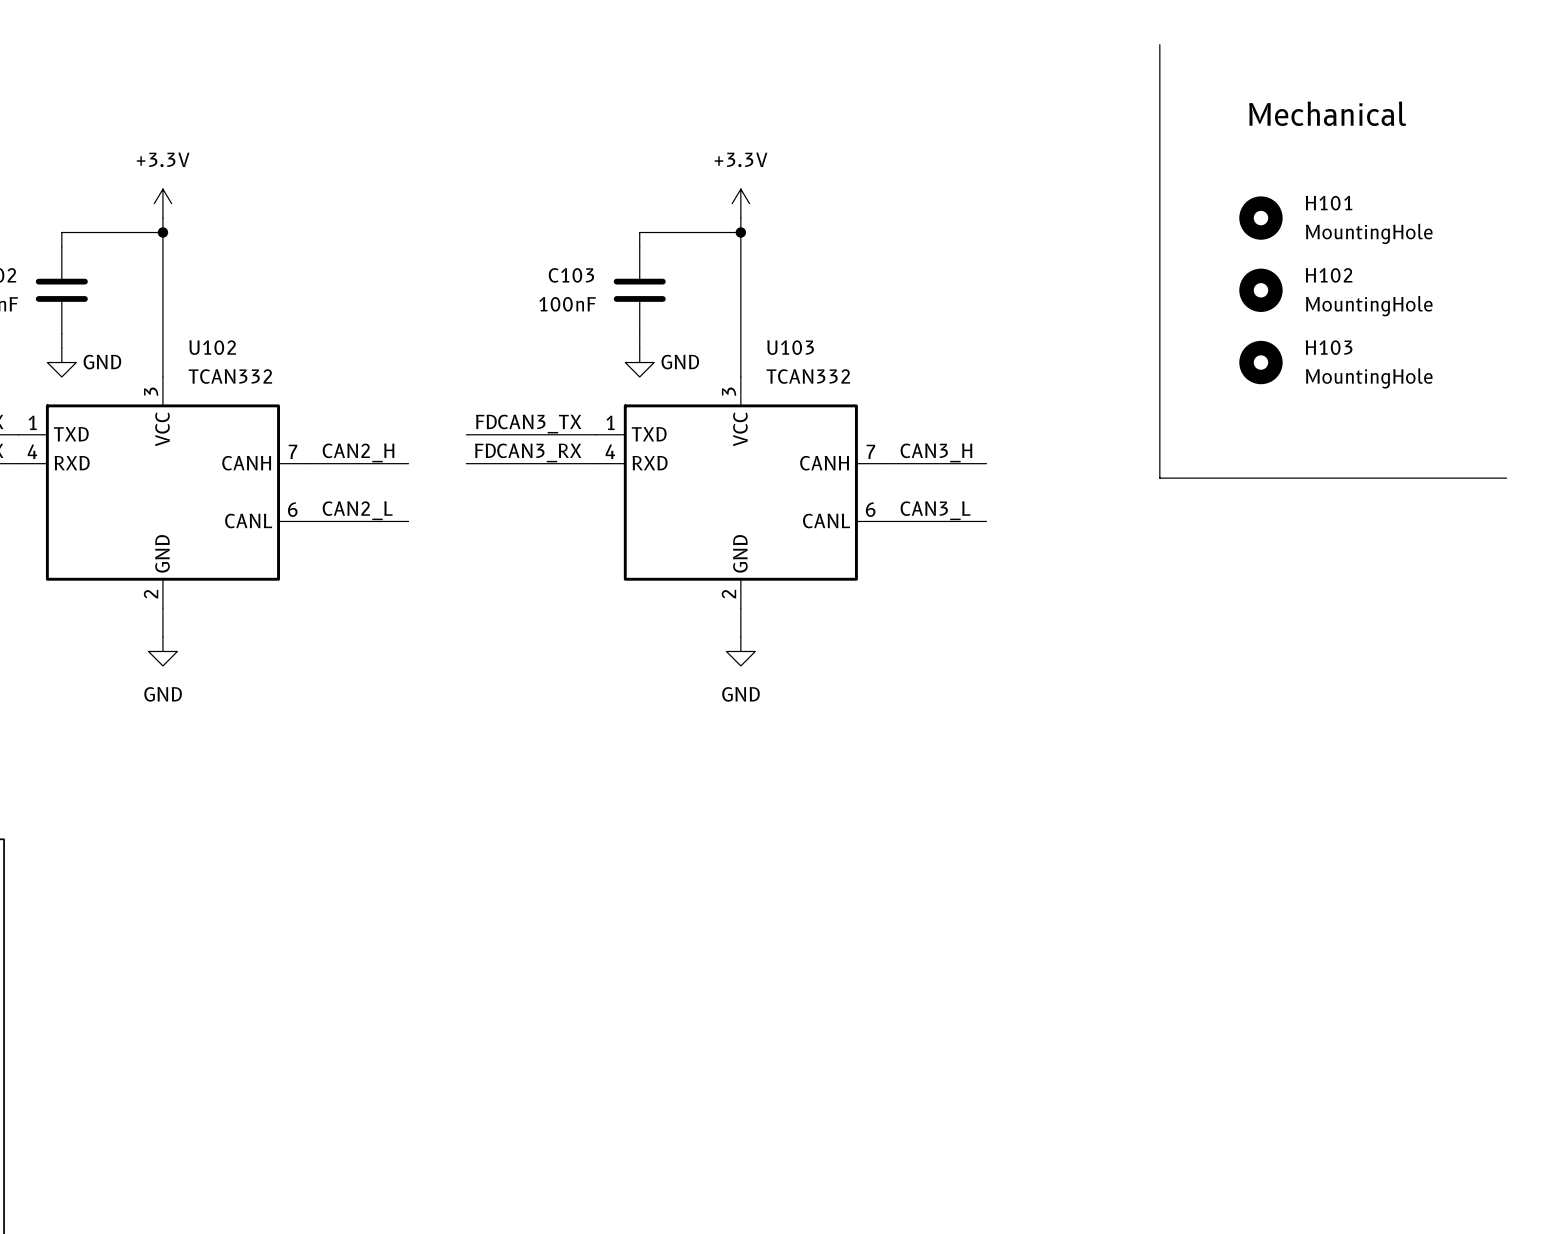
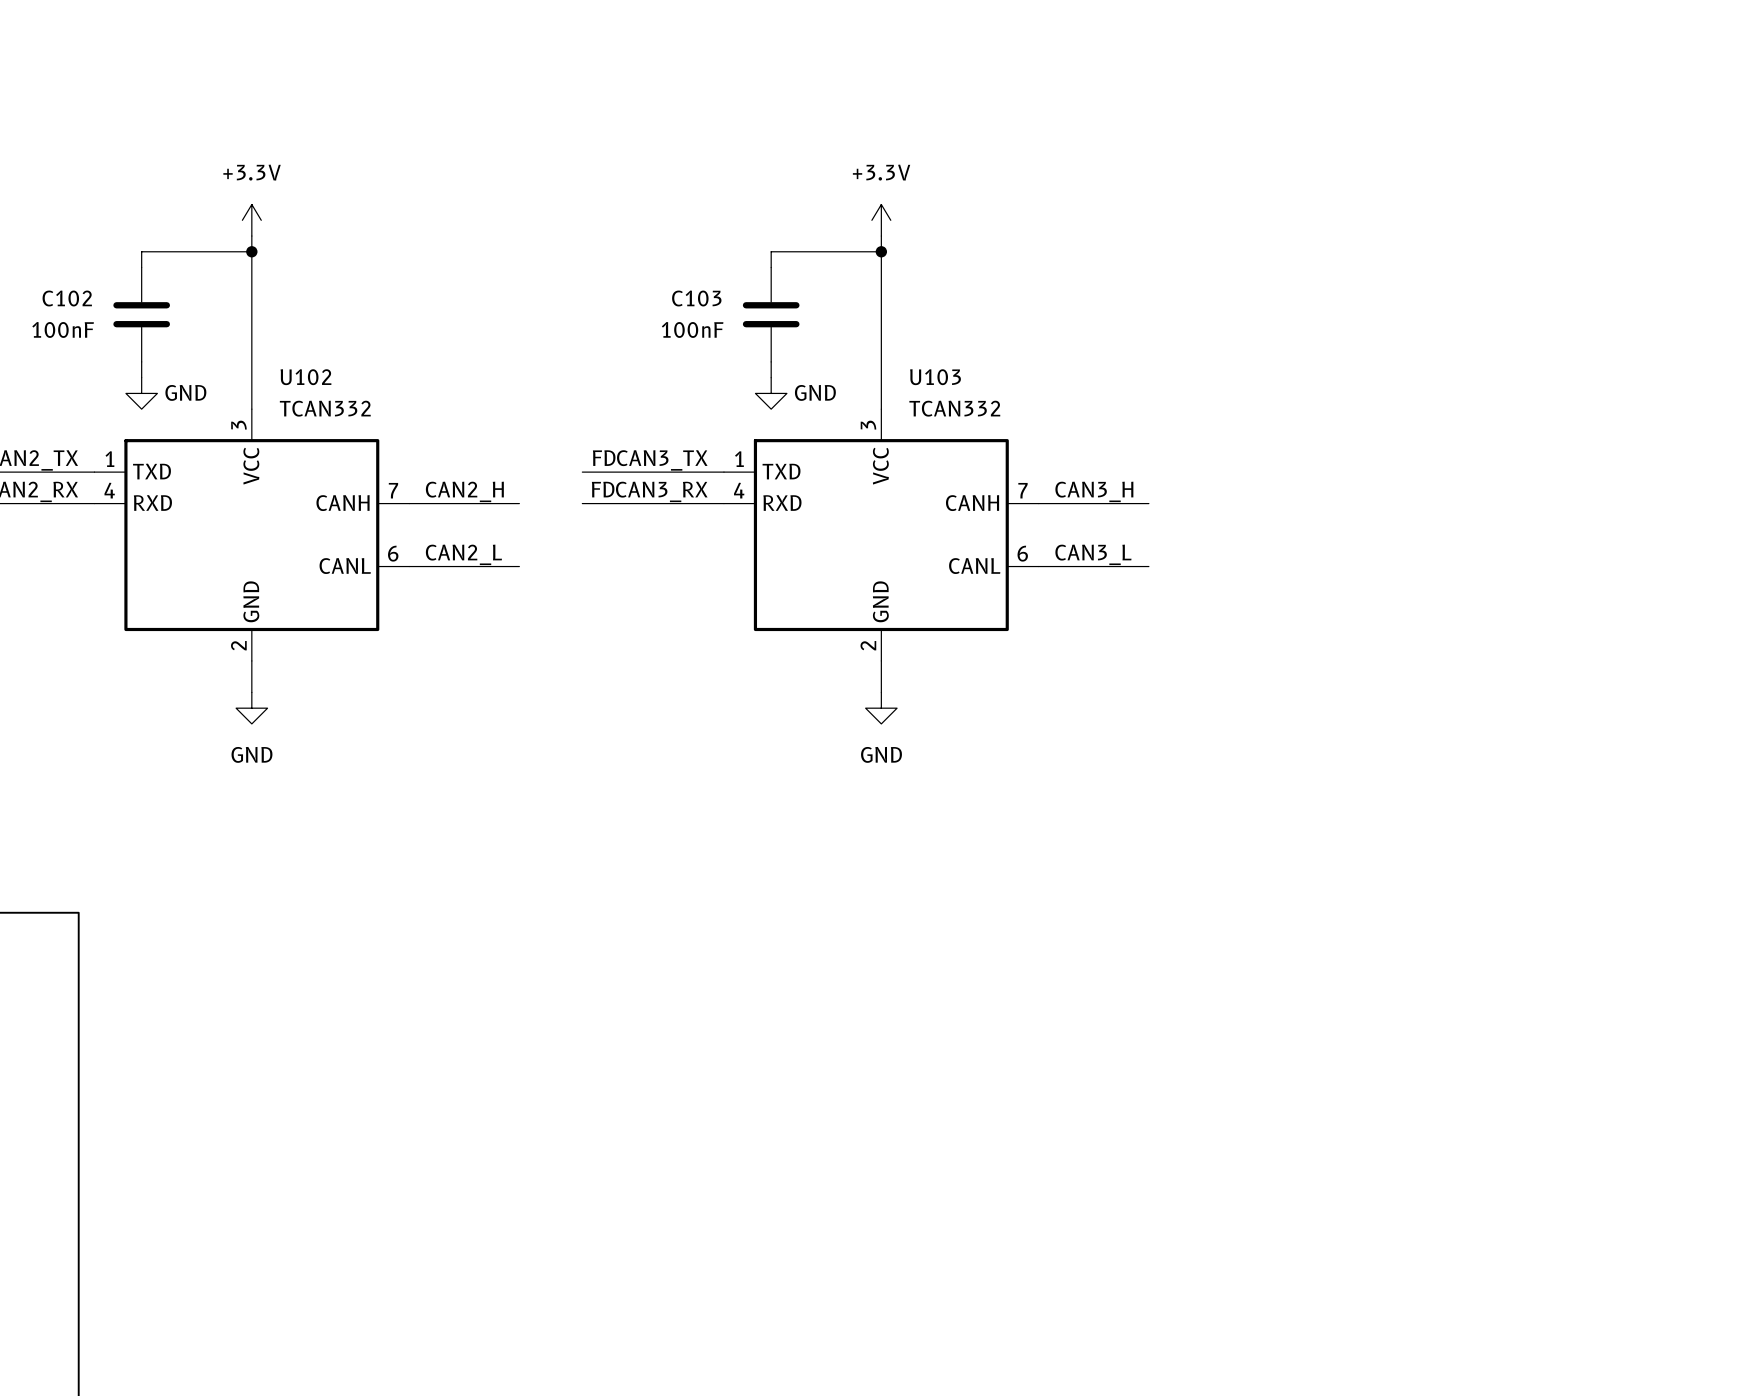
line: (1159, 44) (1159, 478) (1506, 478) -> none
text: Mechanical (1327, 113) -> none
H101: MountingHole (1260, 218) -> none
H102: MountingHole (1260, 290) -> none
H103: MountingHole (1260, 362) -> none

